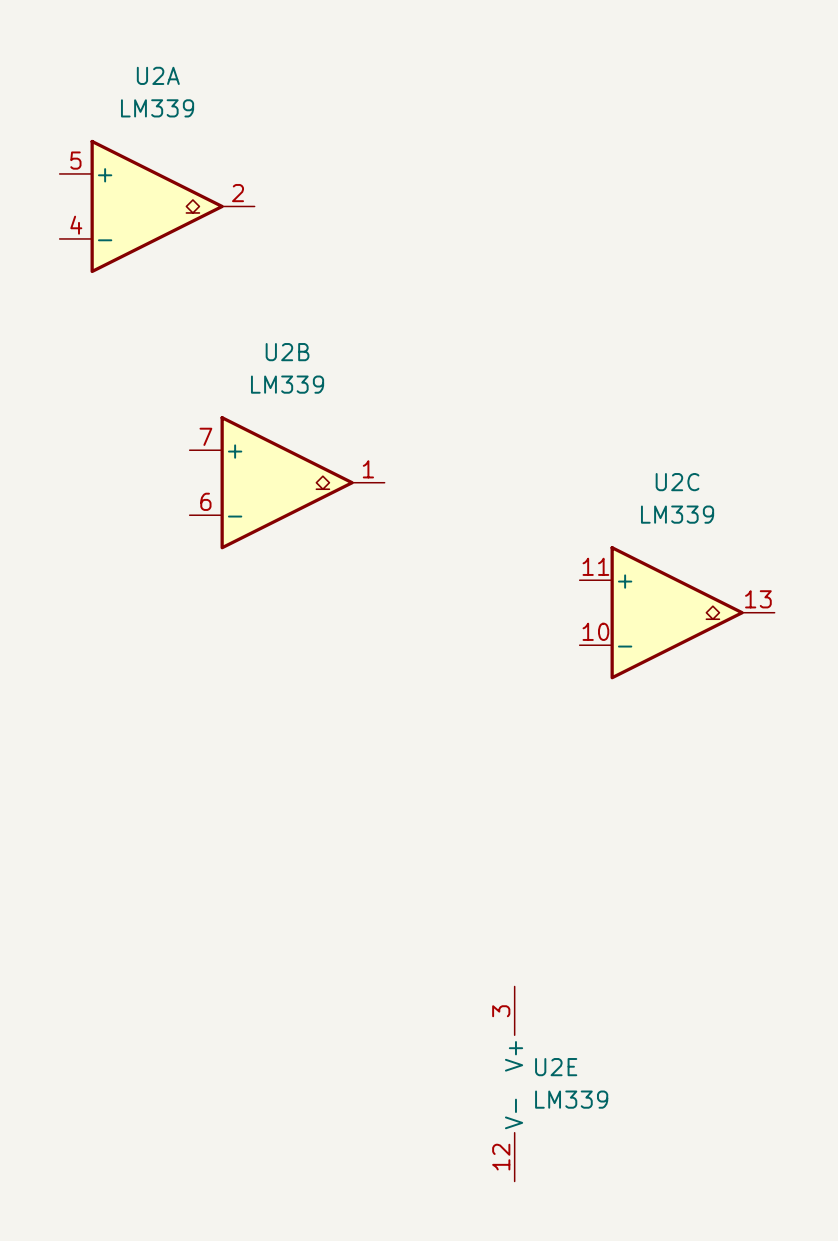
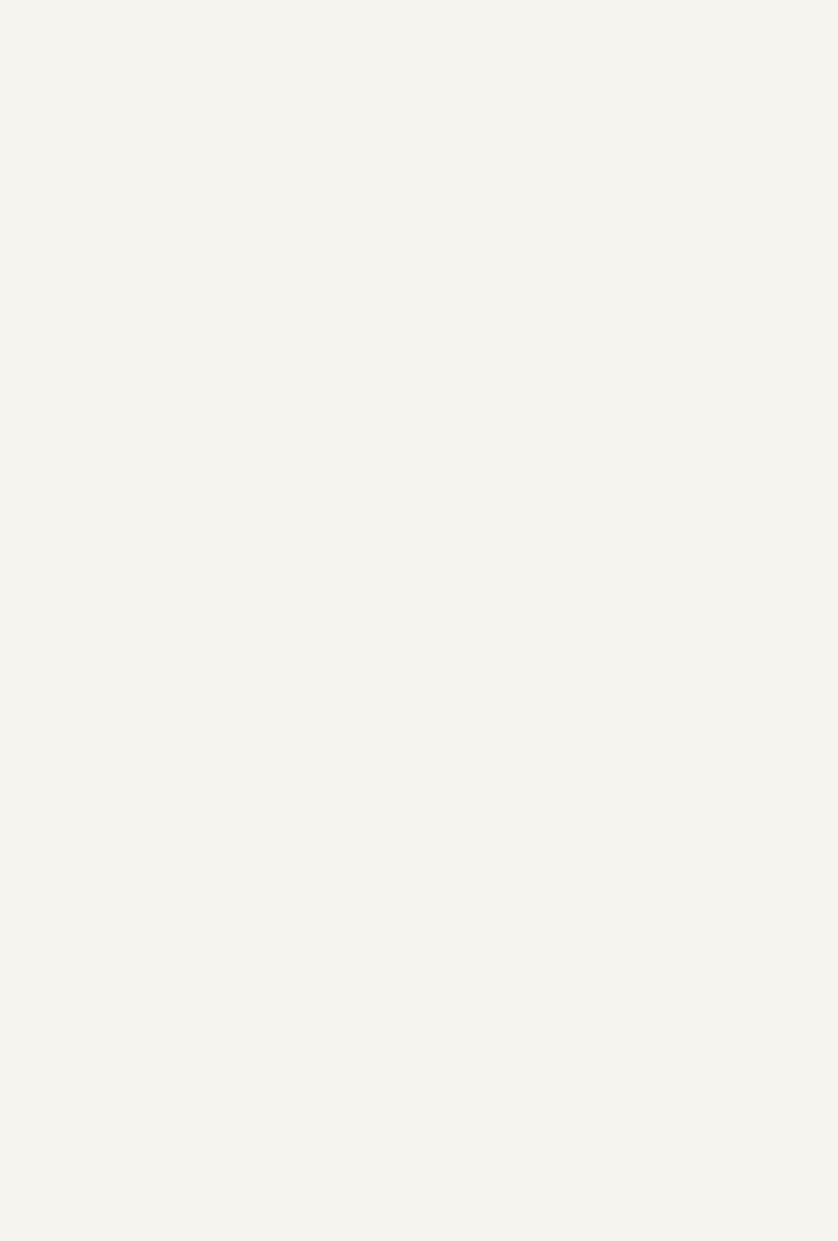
U2A: LM339 (157, 206) -> none
U2B: LM339 (287, 482) -> none
U2C: LM339 (677, 612) -> none
U2E: LM339 (514, 1083) -> none

